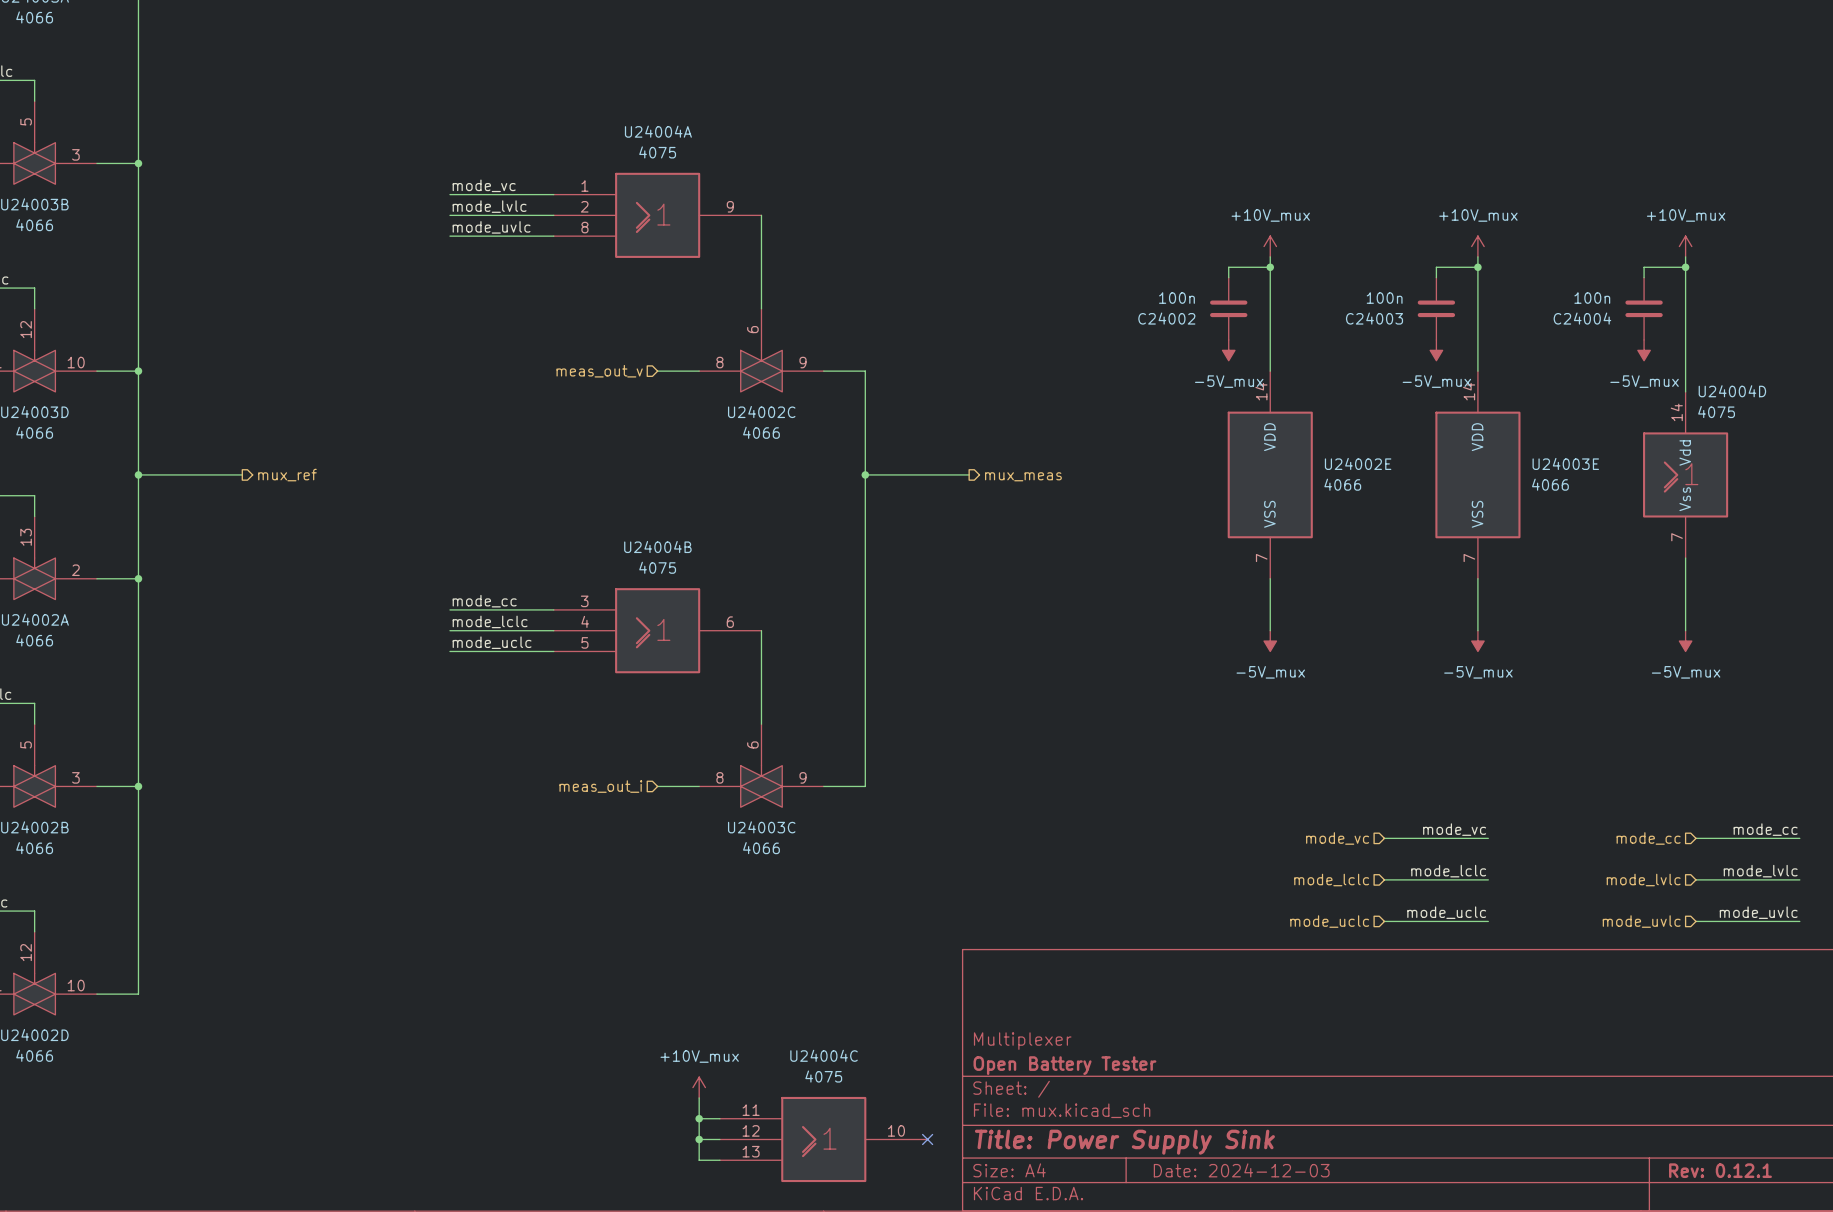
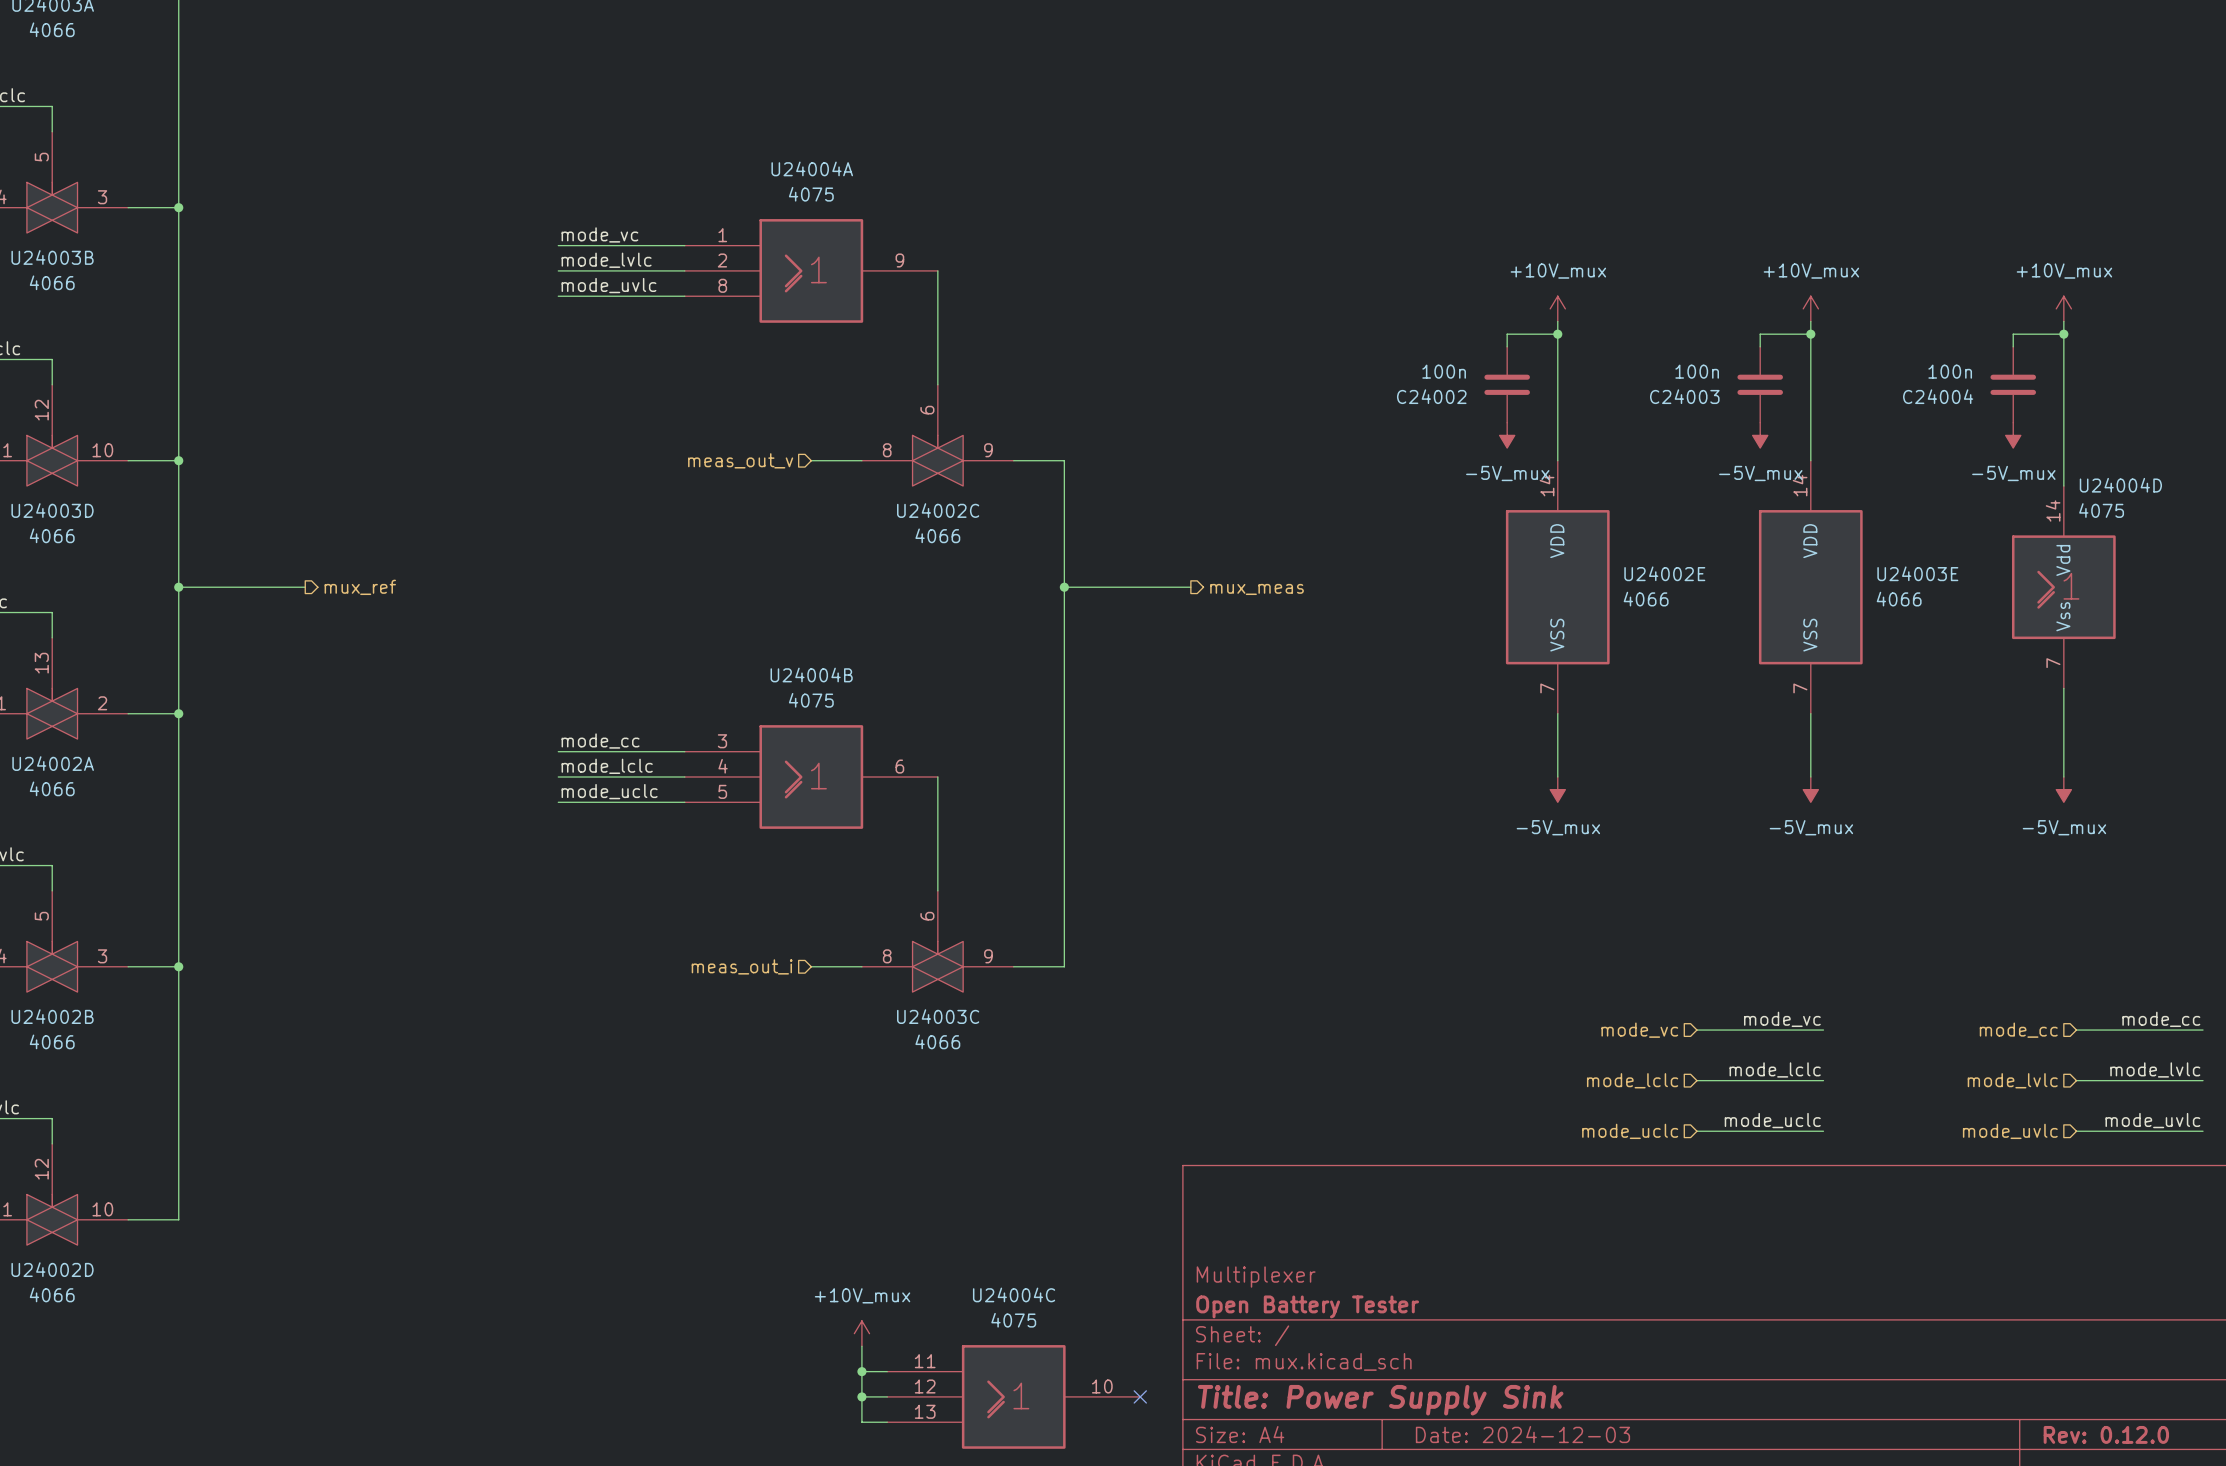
title block: Rev: 0.12.1 (1720, 1170) -> Rev: 0.12.0 (2106, 1434)

